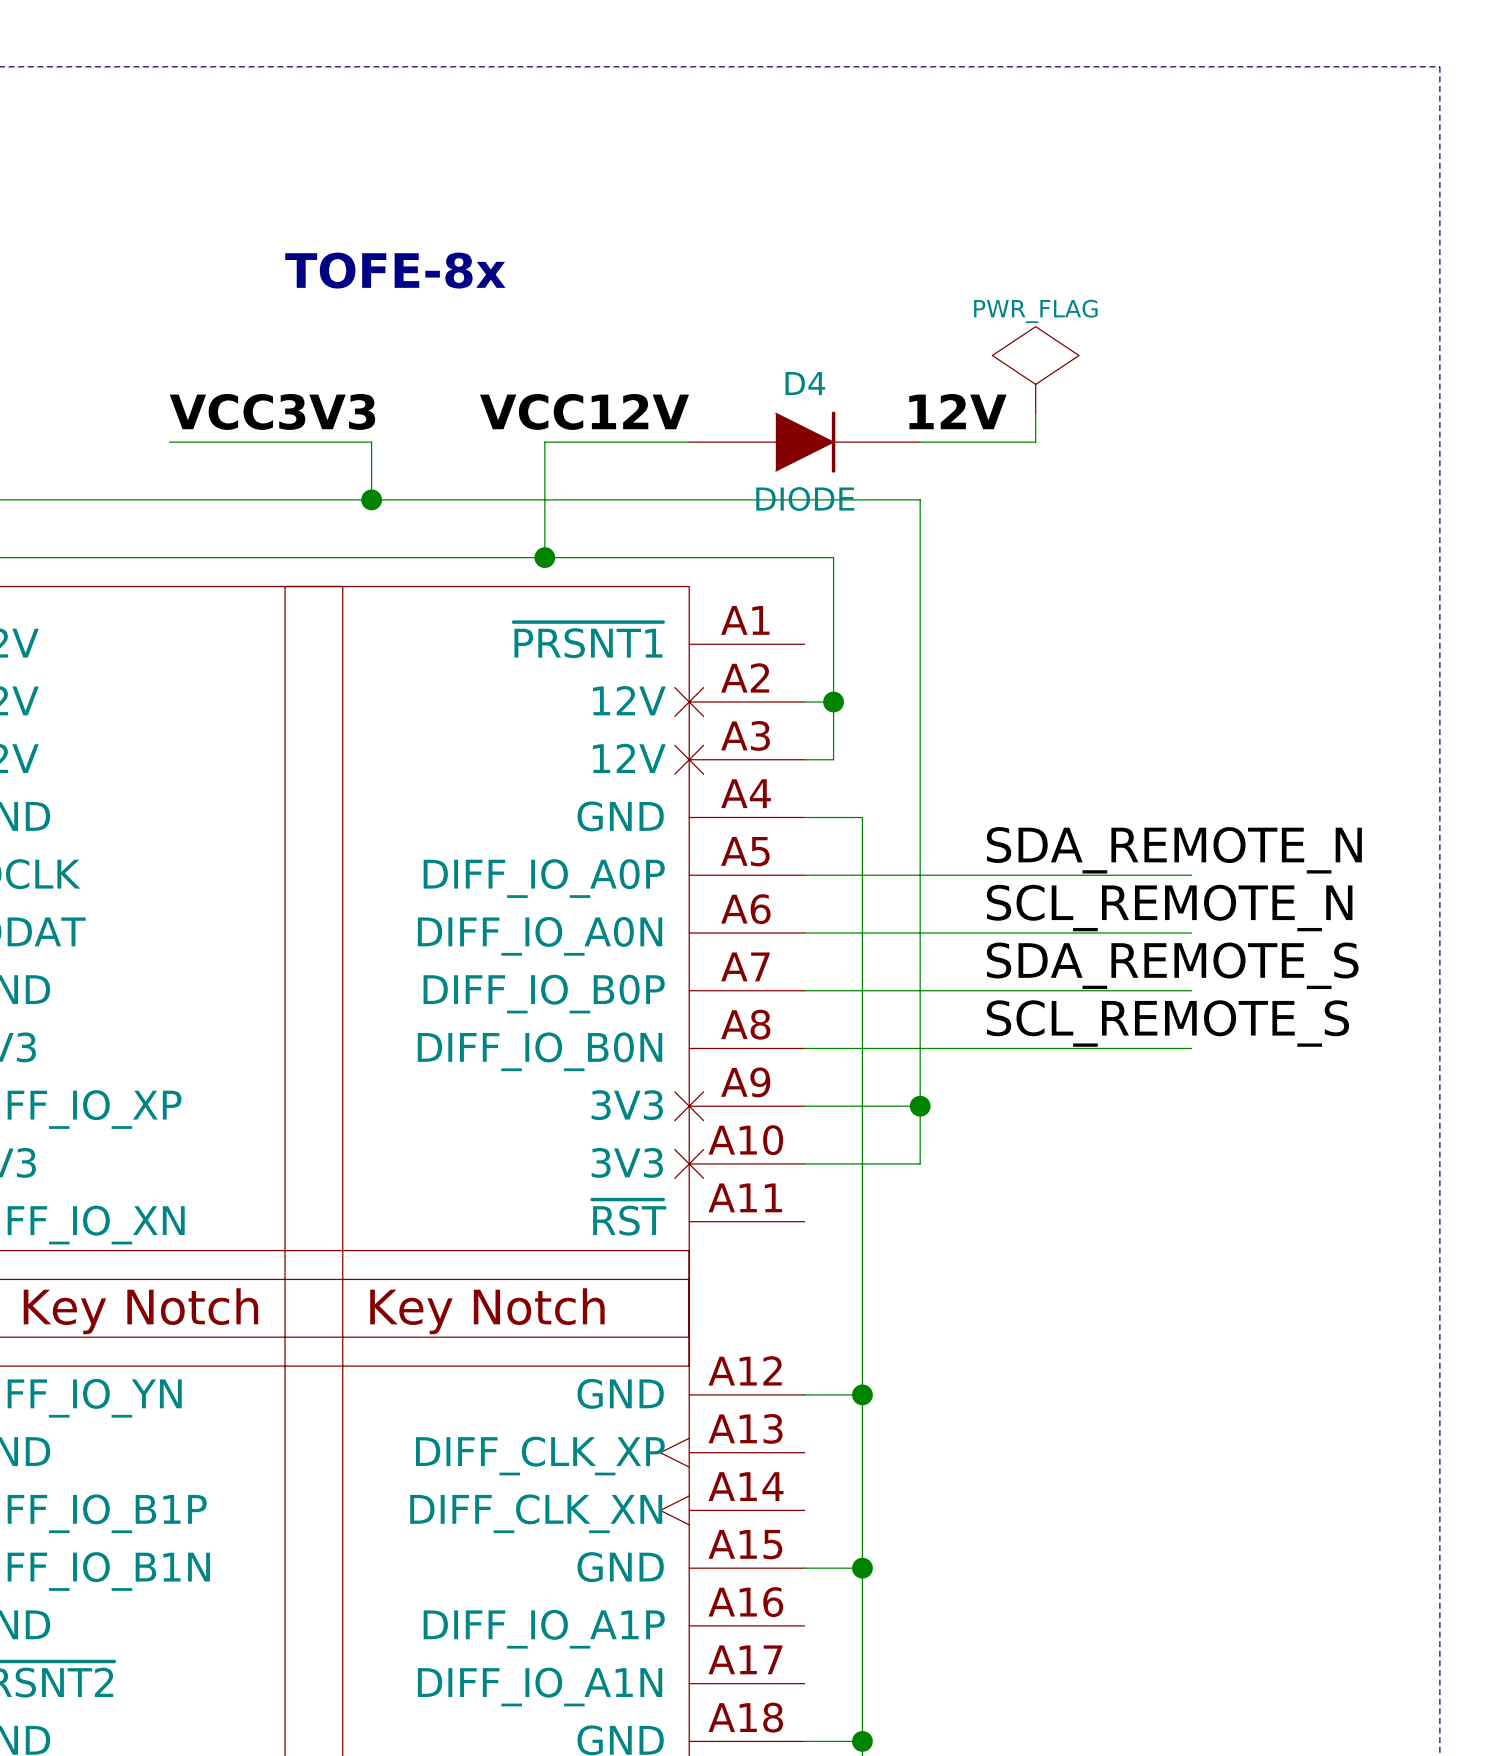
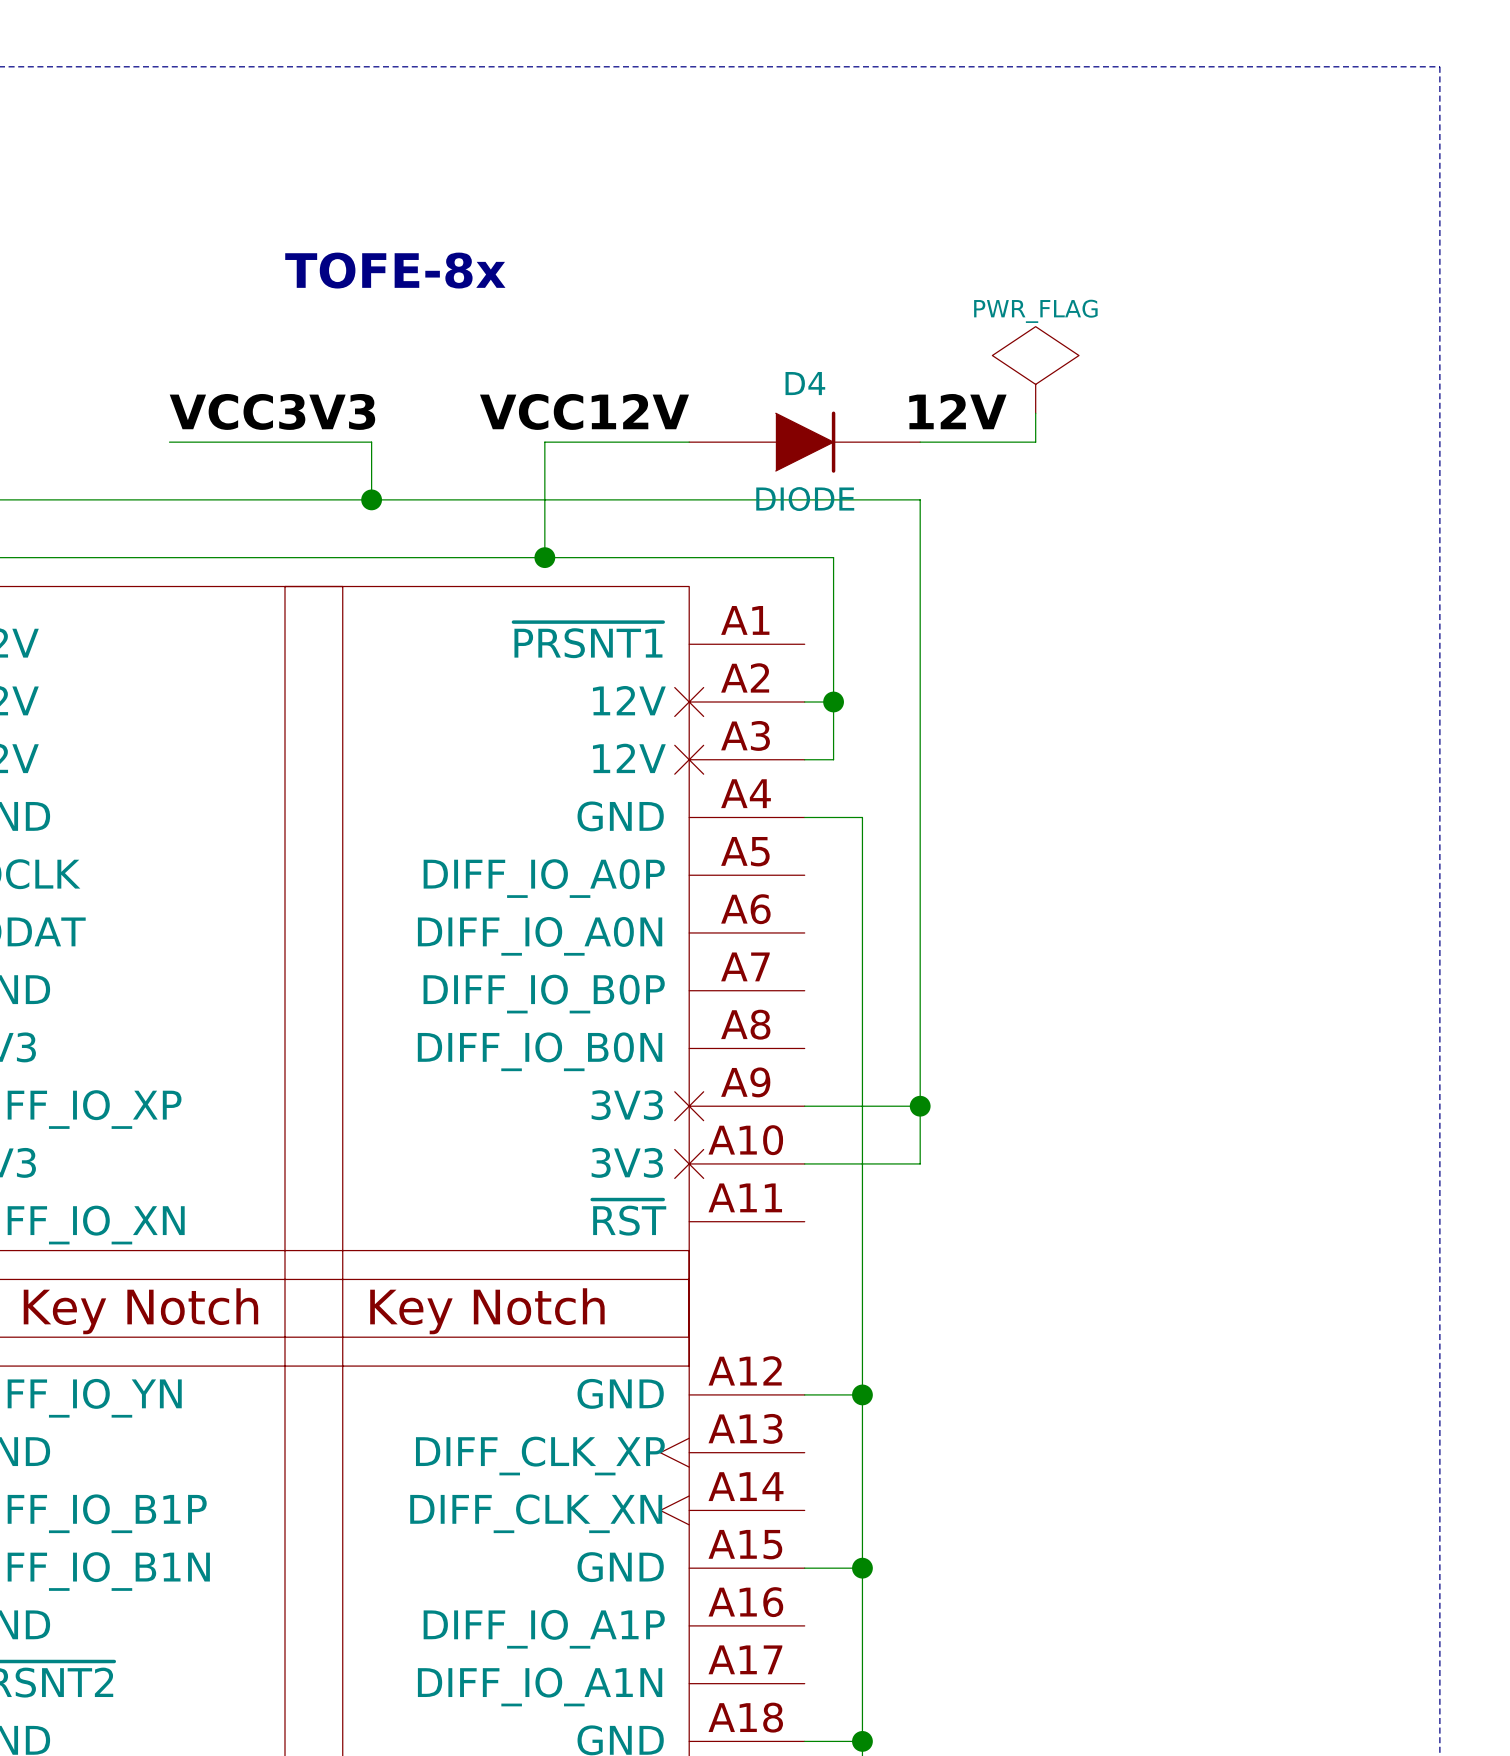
label: SDA_REMOTE_N (1174, 850) -> none
wire: (804, 875) (1191, 875) -> none
label: SCL_REMOTE_N (1169, 908) -> none
wire: (804, 932) (1191, 932) -> none
label: SDA_REMOTE_S (1172, 965) -> none
wire: (804, 990) (1191, 990) -> none
label: SCL_REMOTE_S (1167, 1023) -> none
wire: (804, 1048) (1191, 1048) -> none

